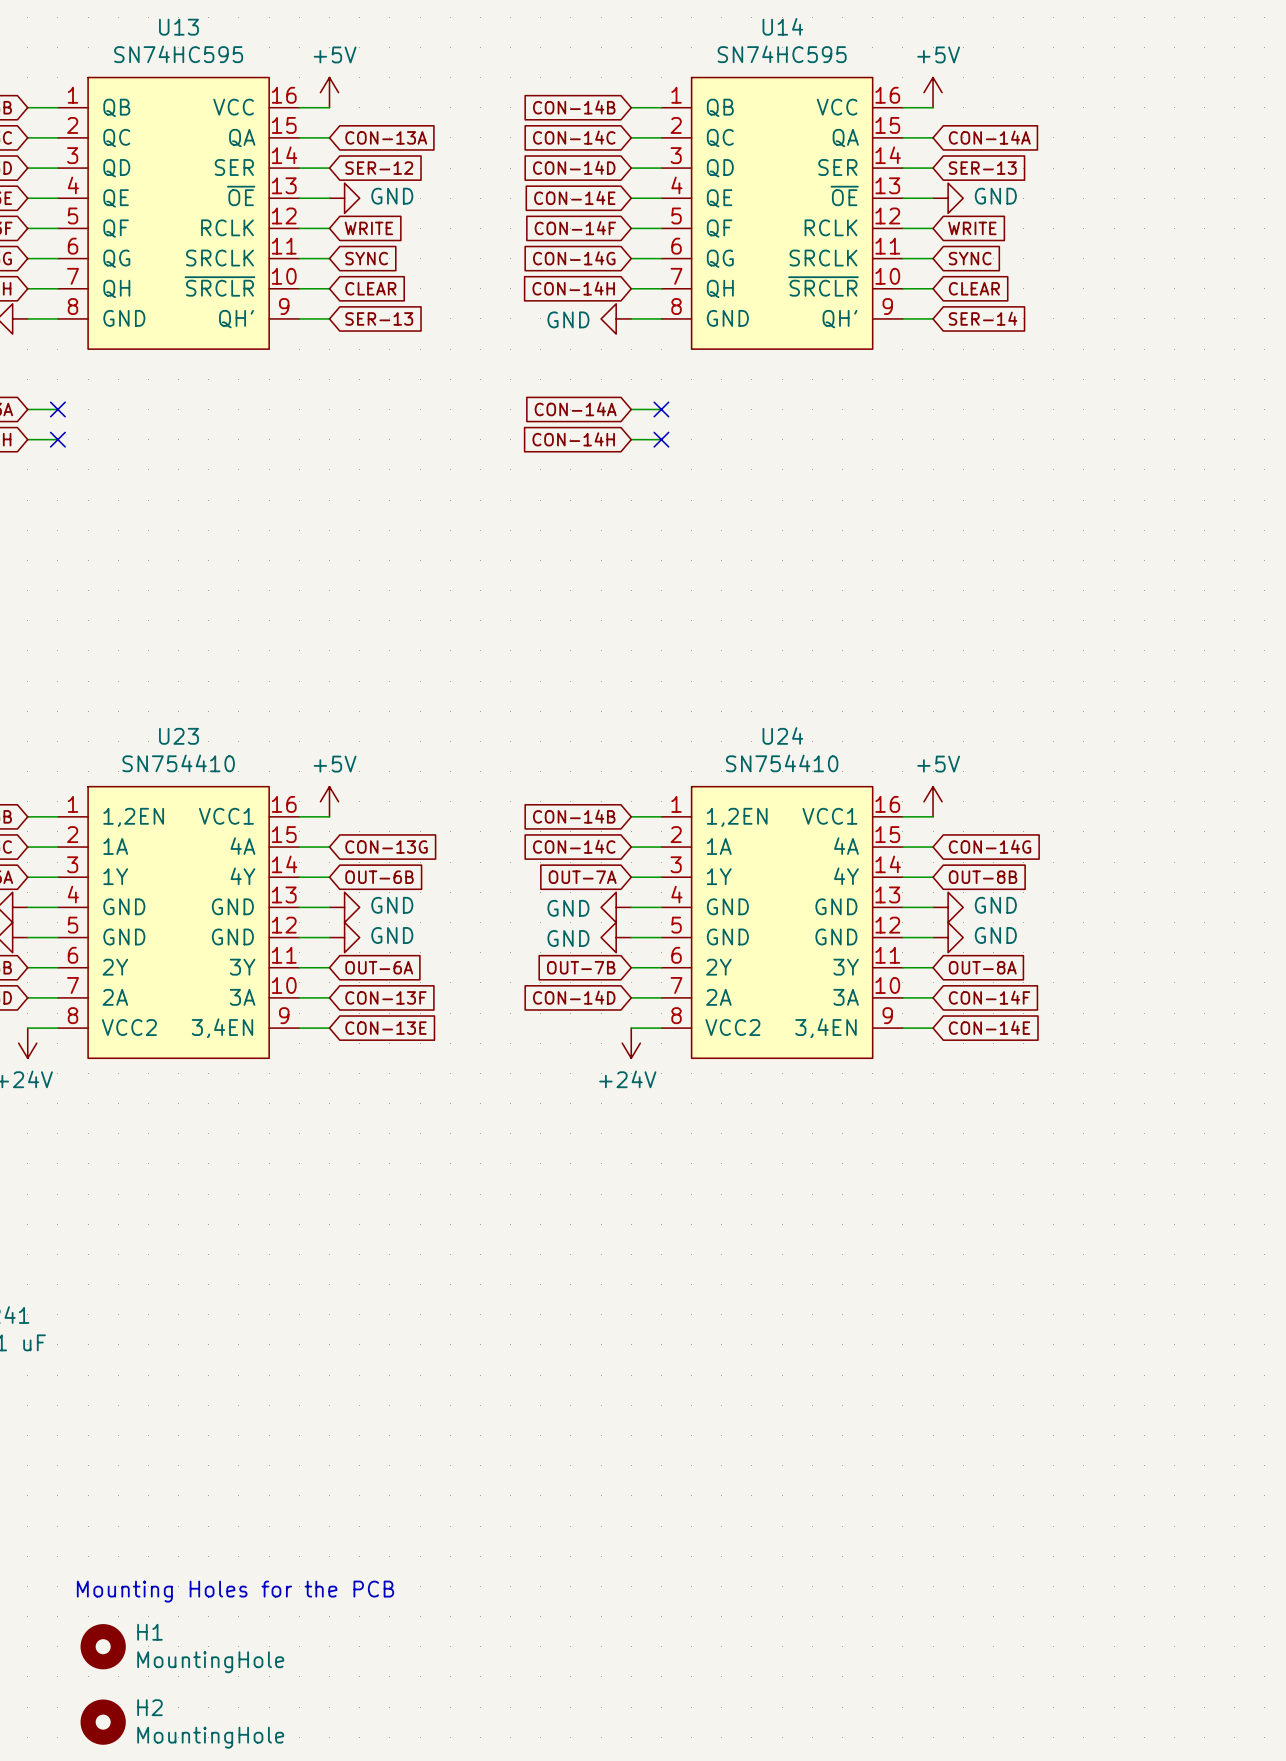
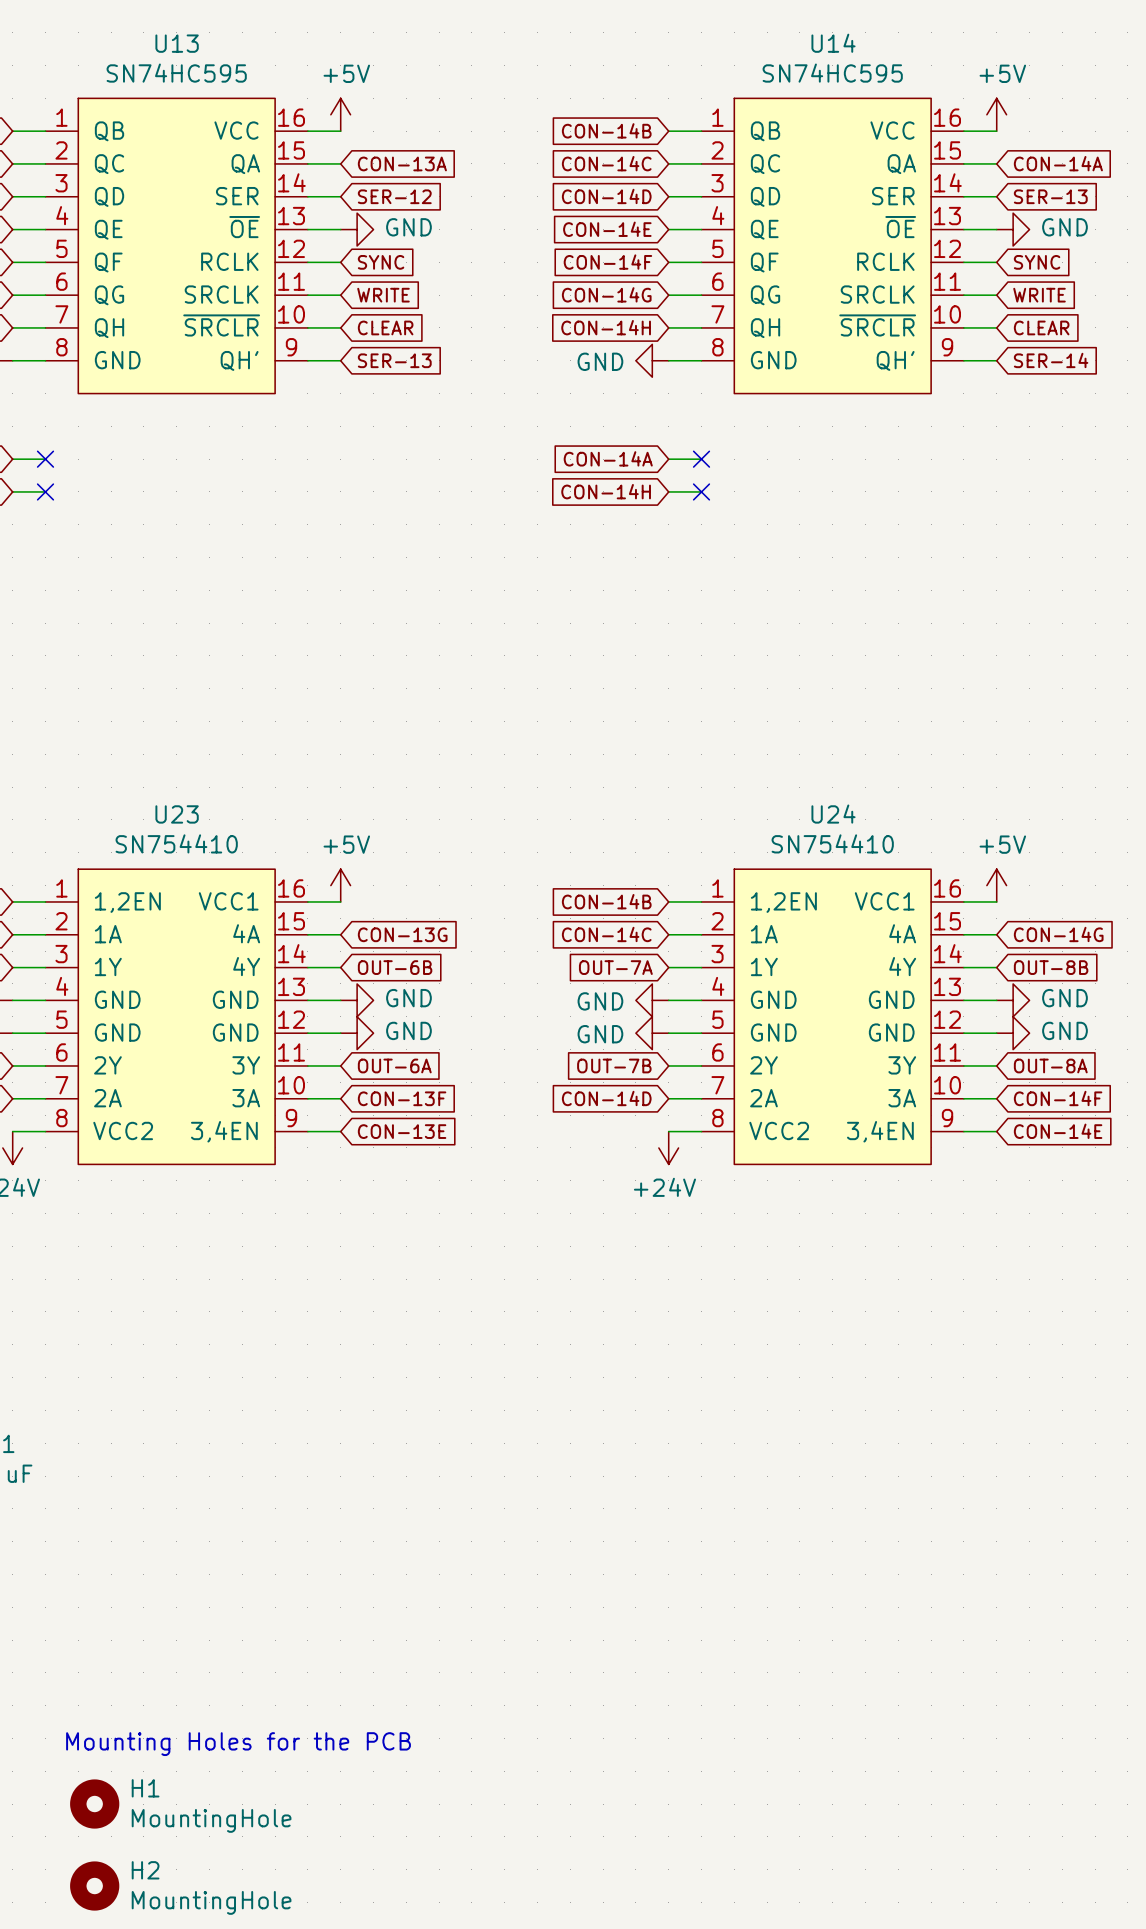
global label: WRITE (368, 228) -> SYNC (381, 262)
global label: WRITE (972, 228) -> SYNC (1037, 262)
global label: SYNC (366, 258) -> WRITE (383, 295)
global label: SYNC (970, 258) -> WRITE (1039, 295)

